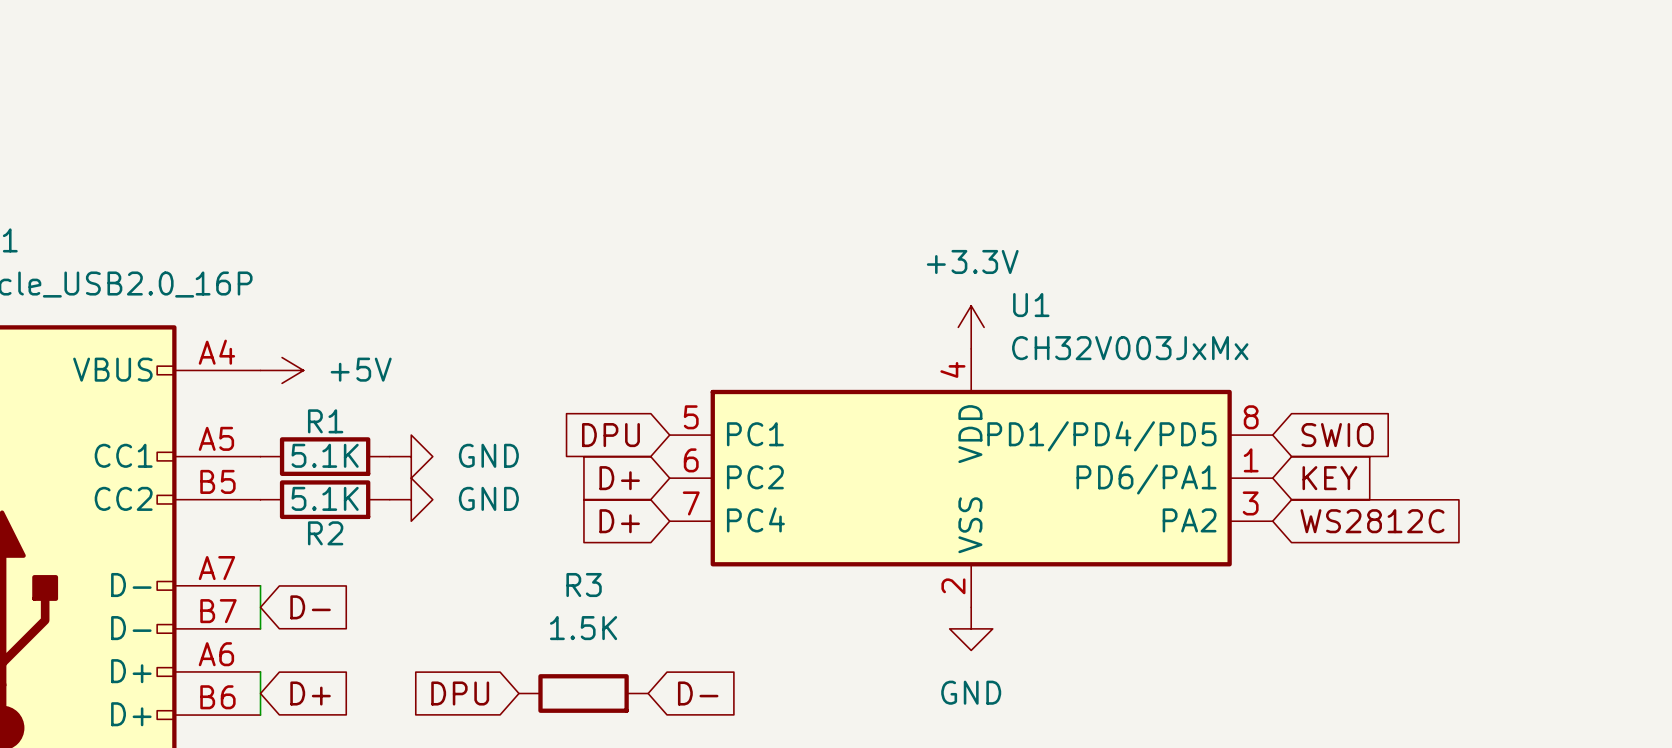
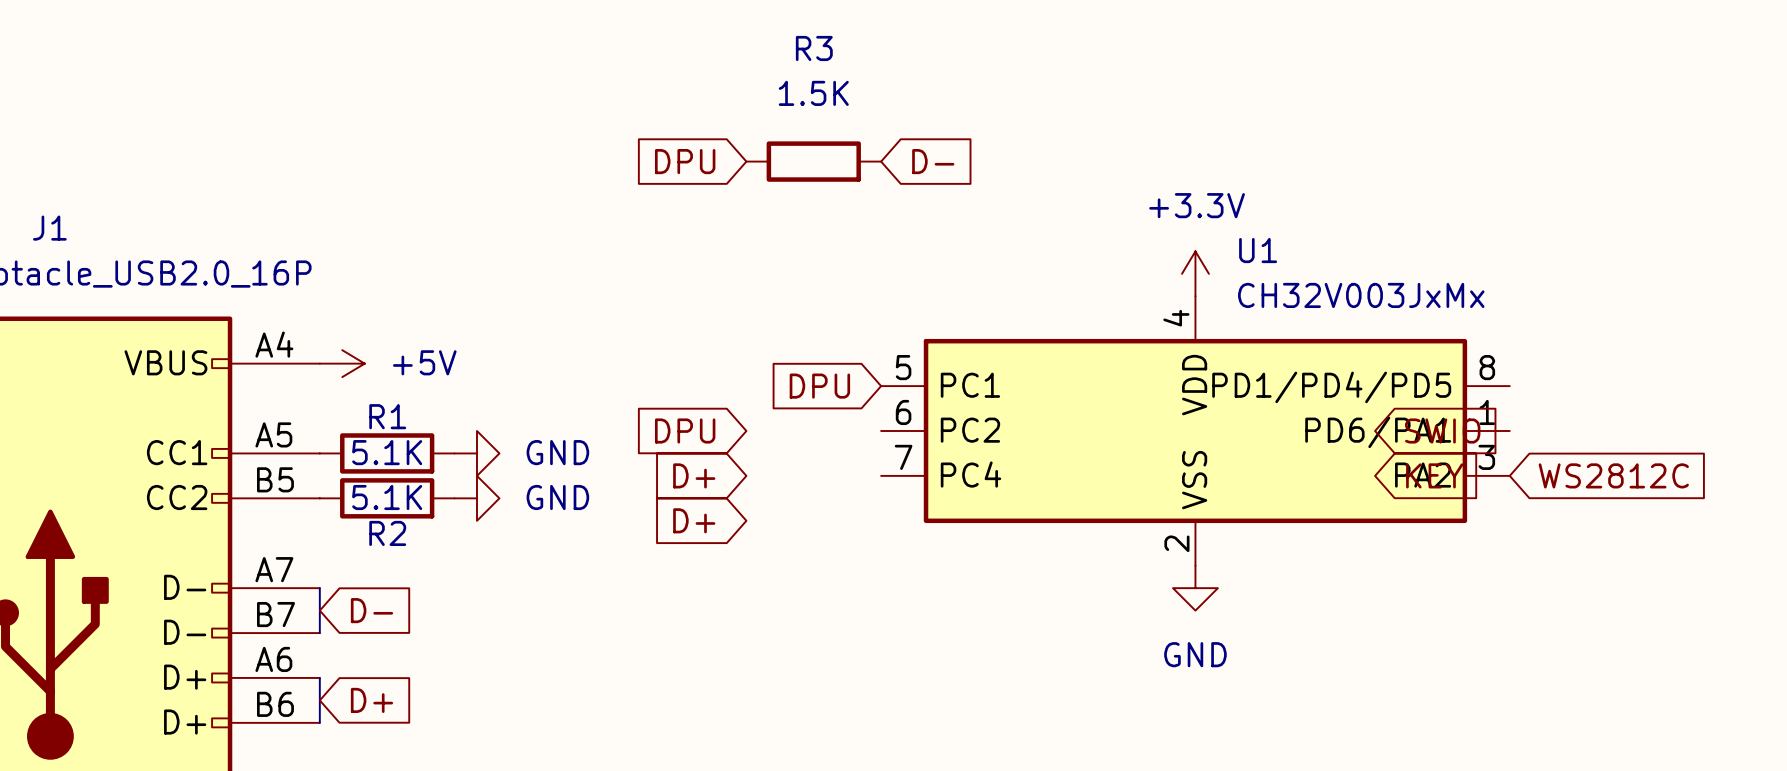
global label: none -> DPU (685, 161)
global label: none -> D- (933, 161)
power symbol position: +3.3V (971, 327) -> +3.3V (1195, 273)
global label: none -> DPU (819, 386)
U1 position: (971, 478) -> (1195, 431)
global label position: WS2812C (1372, 521) -> WS2812C (1613, 475)
power symbol position: GND (971, 628) -> GND (1195, 588)
global label: DPU (460, 693) -> none
R3 position: (583, 693) -> (813, 161)
global label: D- (698, 693) -> none

